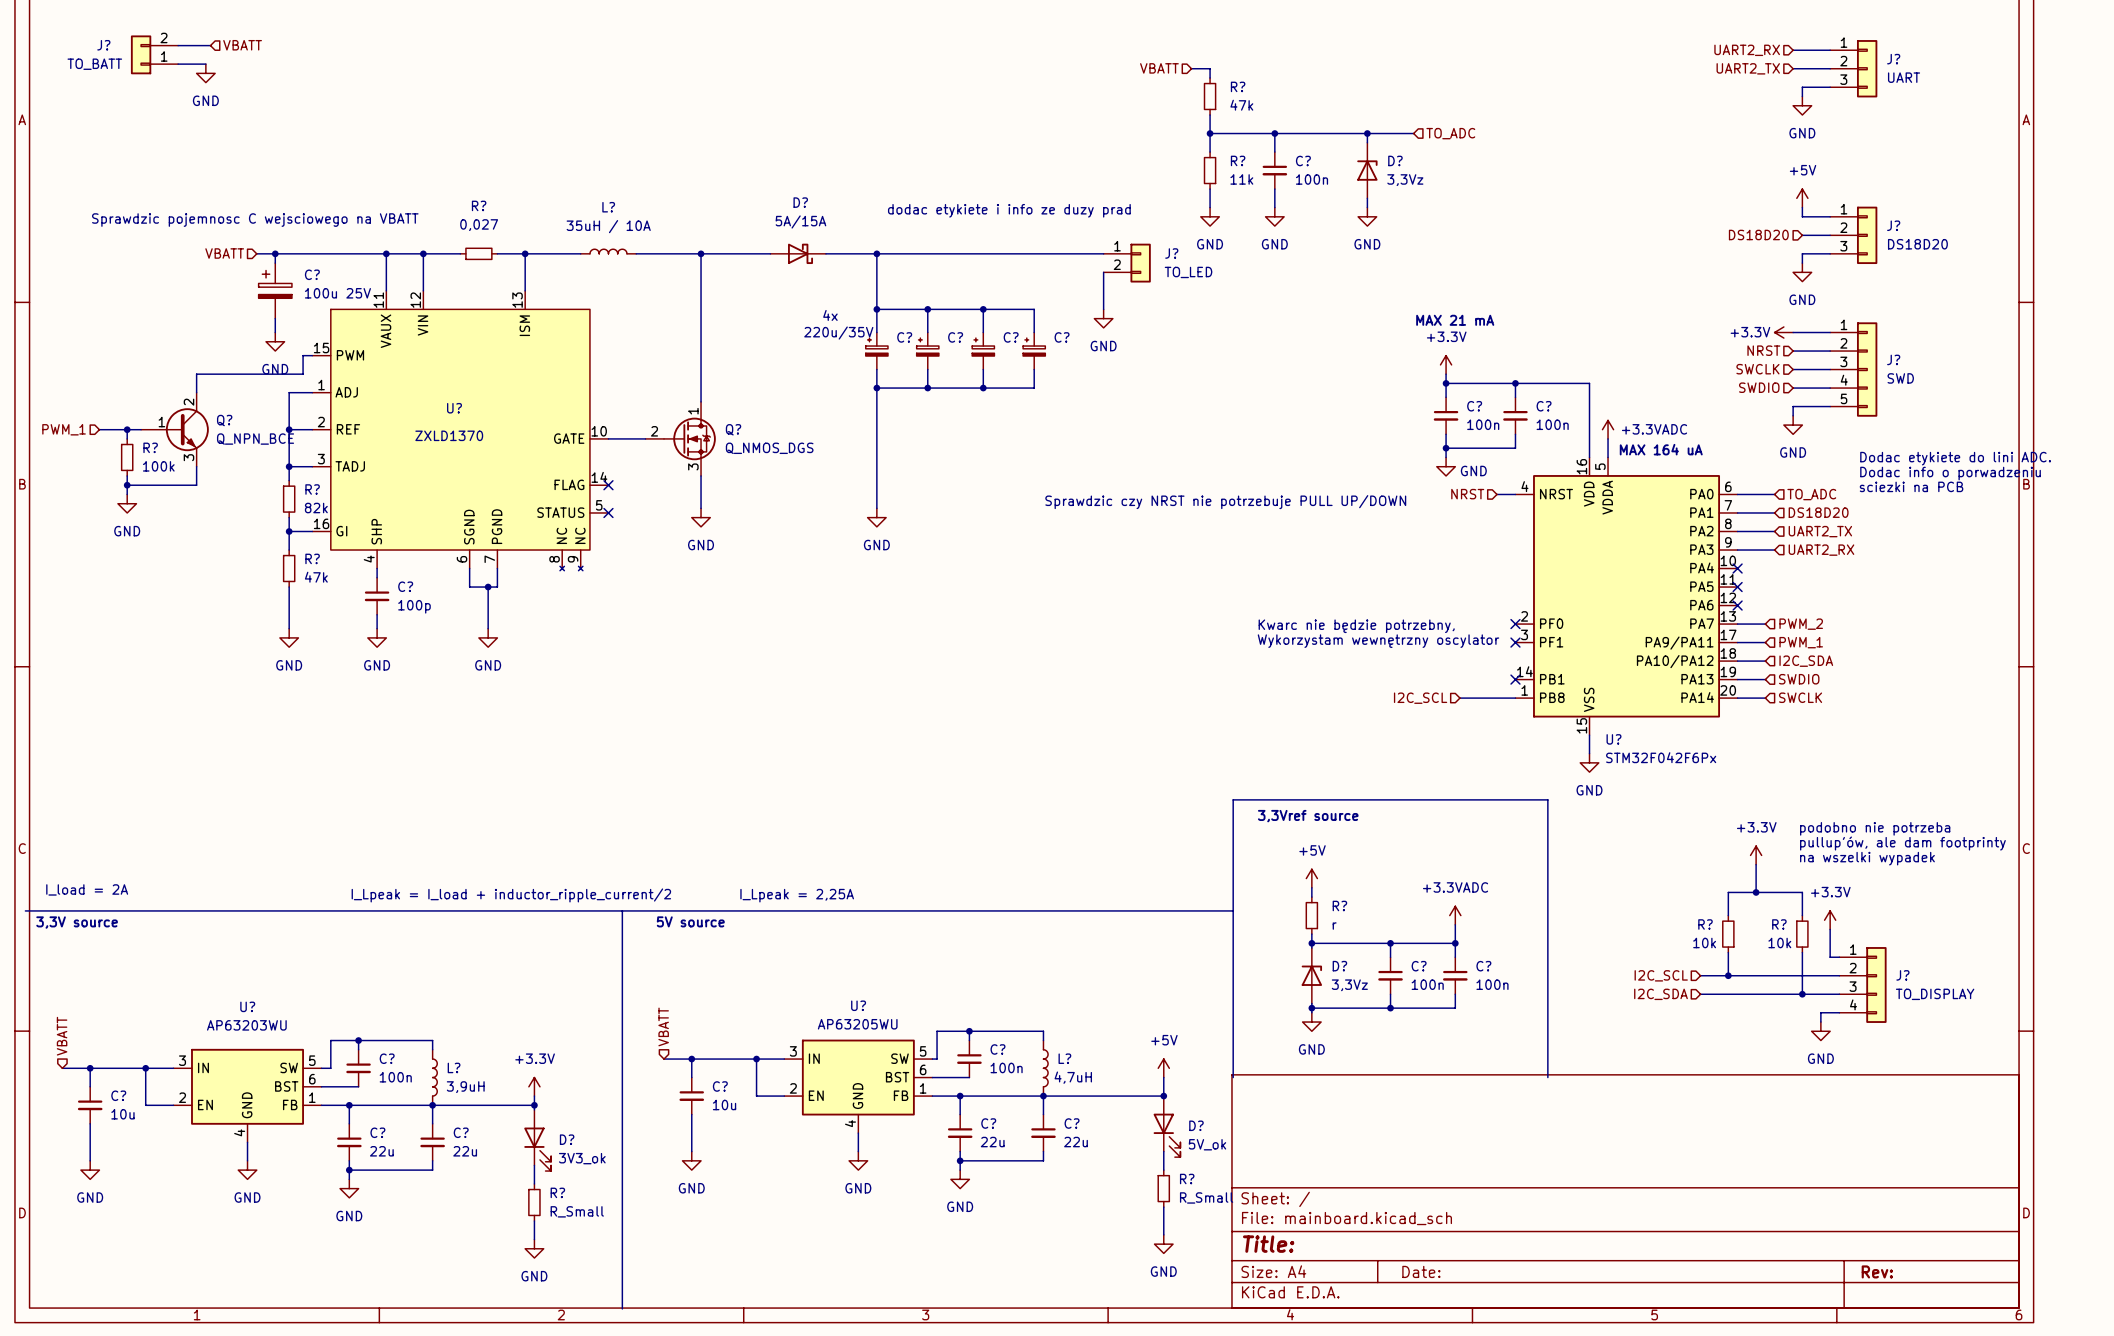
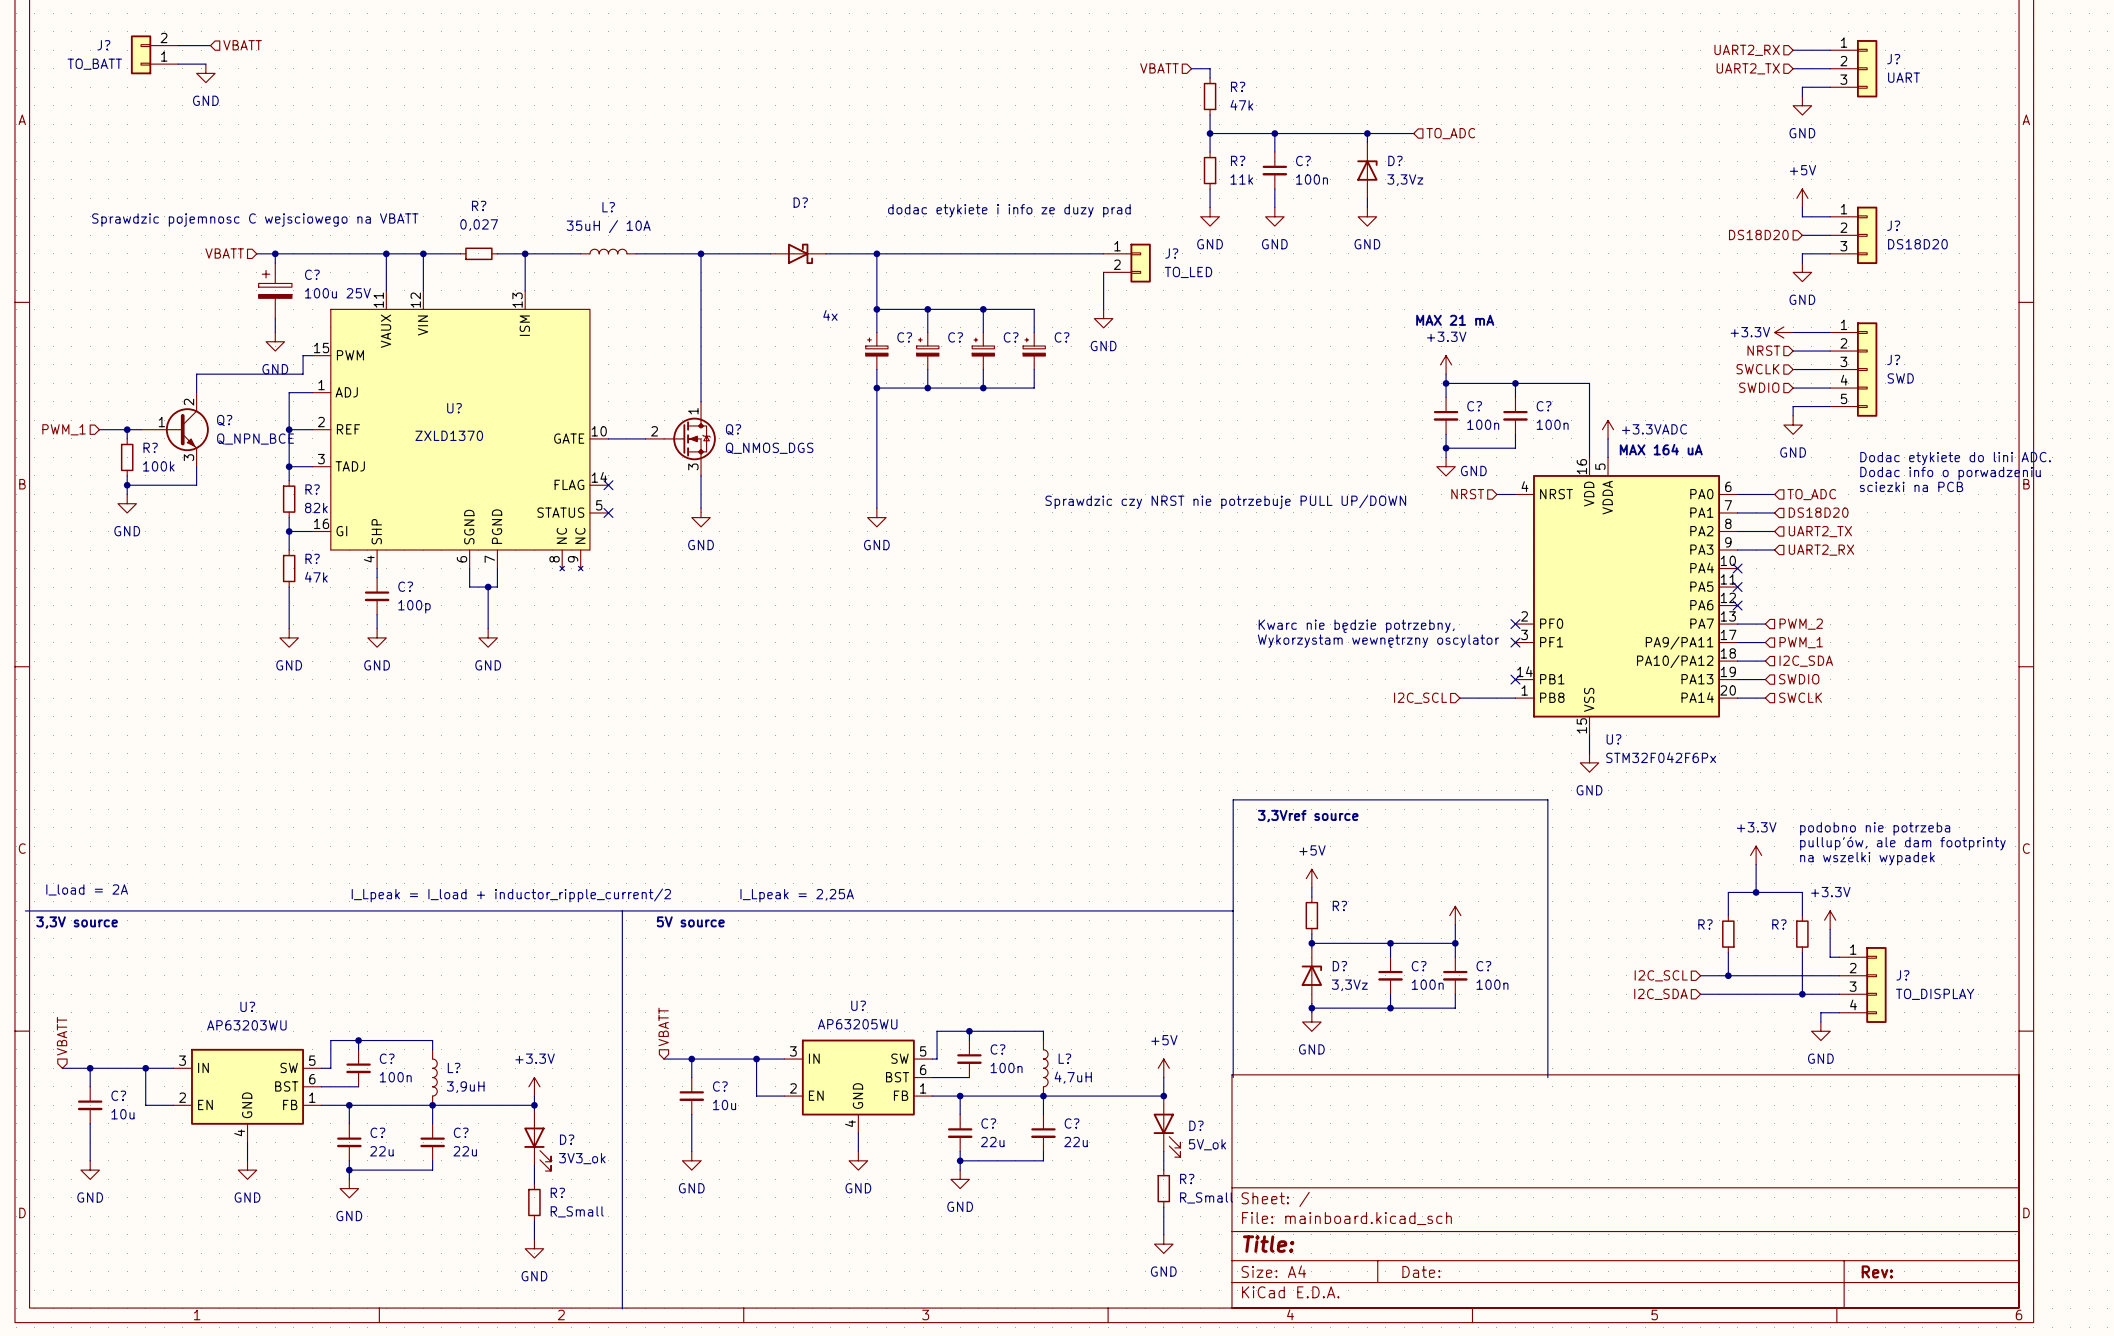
D? value: 5A/15A (800, 221) -> none
C? value: 220u/35V (838, 333) -> none
power symbol text: +3.3VADC (1455, 887) -> none
R? value: r (1334, 926) -> none
R? value: 10k (1704, 943) -> none
R? value: 10k (1779, 943) -> none

